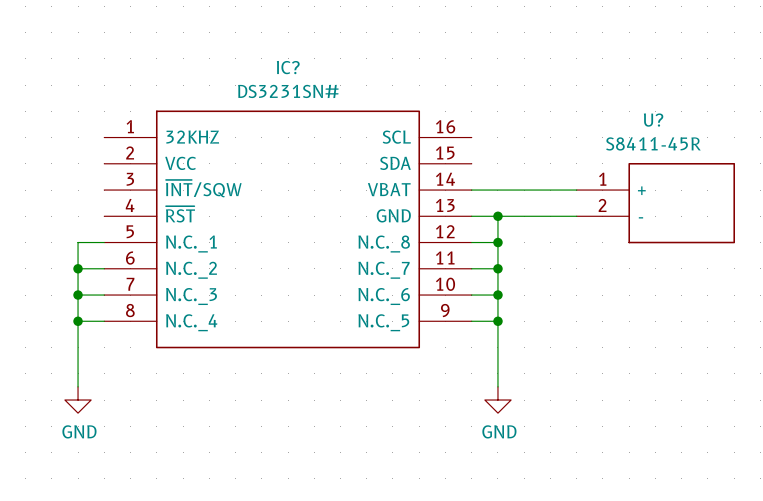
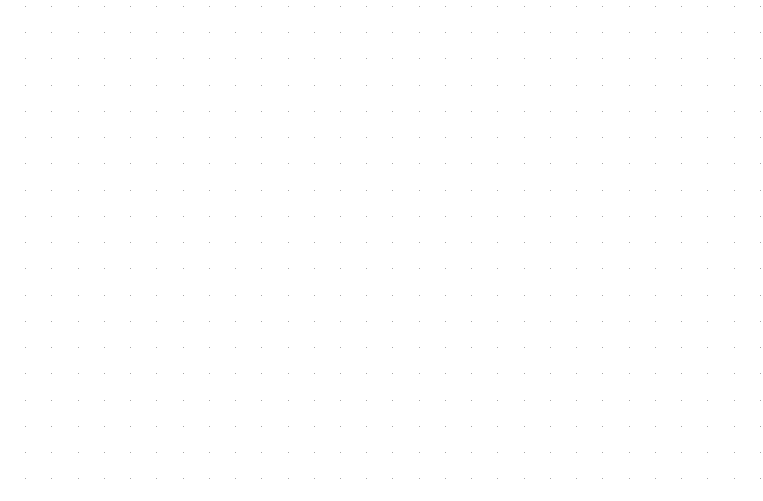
wire: (471, 190) (576, 190) -> none
U?: S8411-45R (655, 203) -> none
wire: (471, 216) (576, 216) -> none
wire: (497, 216) (497, 386) -> none
junction: (497, 216) -> none
IC?: DS3231SN# (288, 229) -> none
wire: (104, 242) (78, 242) (78, 386) -> none
wire: (471, 242) (497, 242) -> none
junction: (497, 242) -> none
wire: (78, 268) (104, 268) -> none
junction: (78, 268) -> none
wire: (471, 268) (497, 268) -> none
junction: (497, 268) -> none
wire: (78, 295) (104, 295) -> none
junction: (78, 295) -> none
wire: (471, 295) (497, 295) -> none
junction: (497, 295) -> none
wire: (78, 321) (104, 321) -> none
junction: (78, 321) -> none
wire: (471, 321) (497, 321) -> none
junction: (497, 321) -> none
power symbol: GND (78, 400) -> none
power symbol: GND (497, 400) -> none

